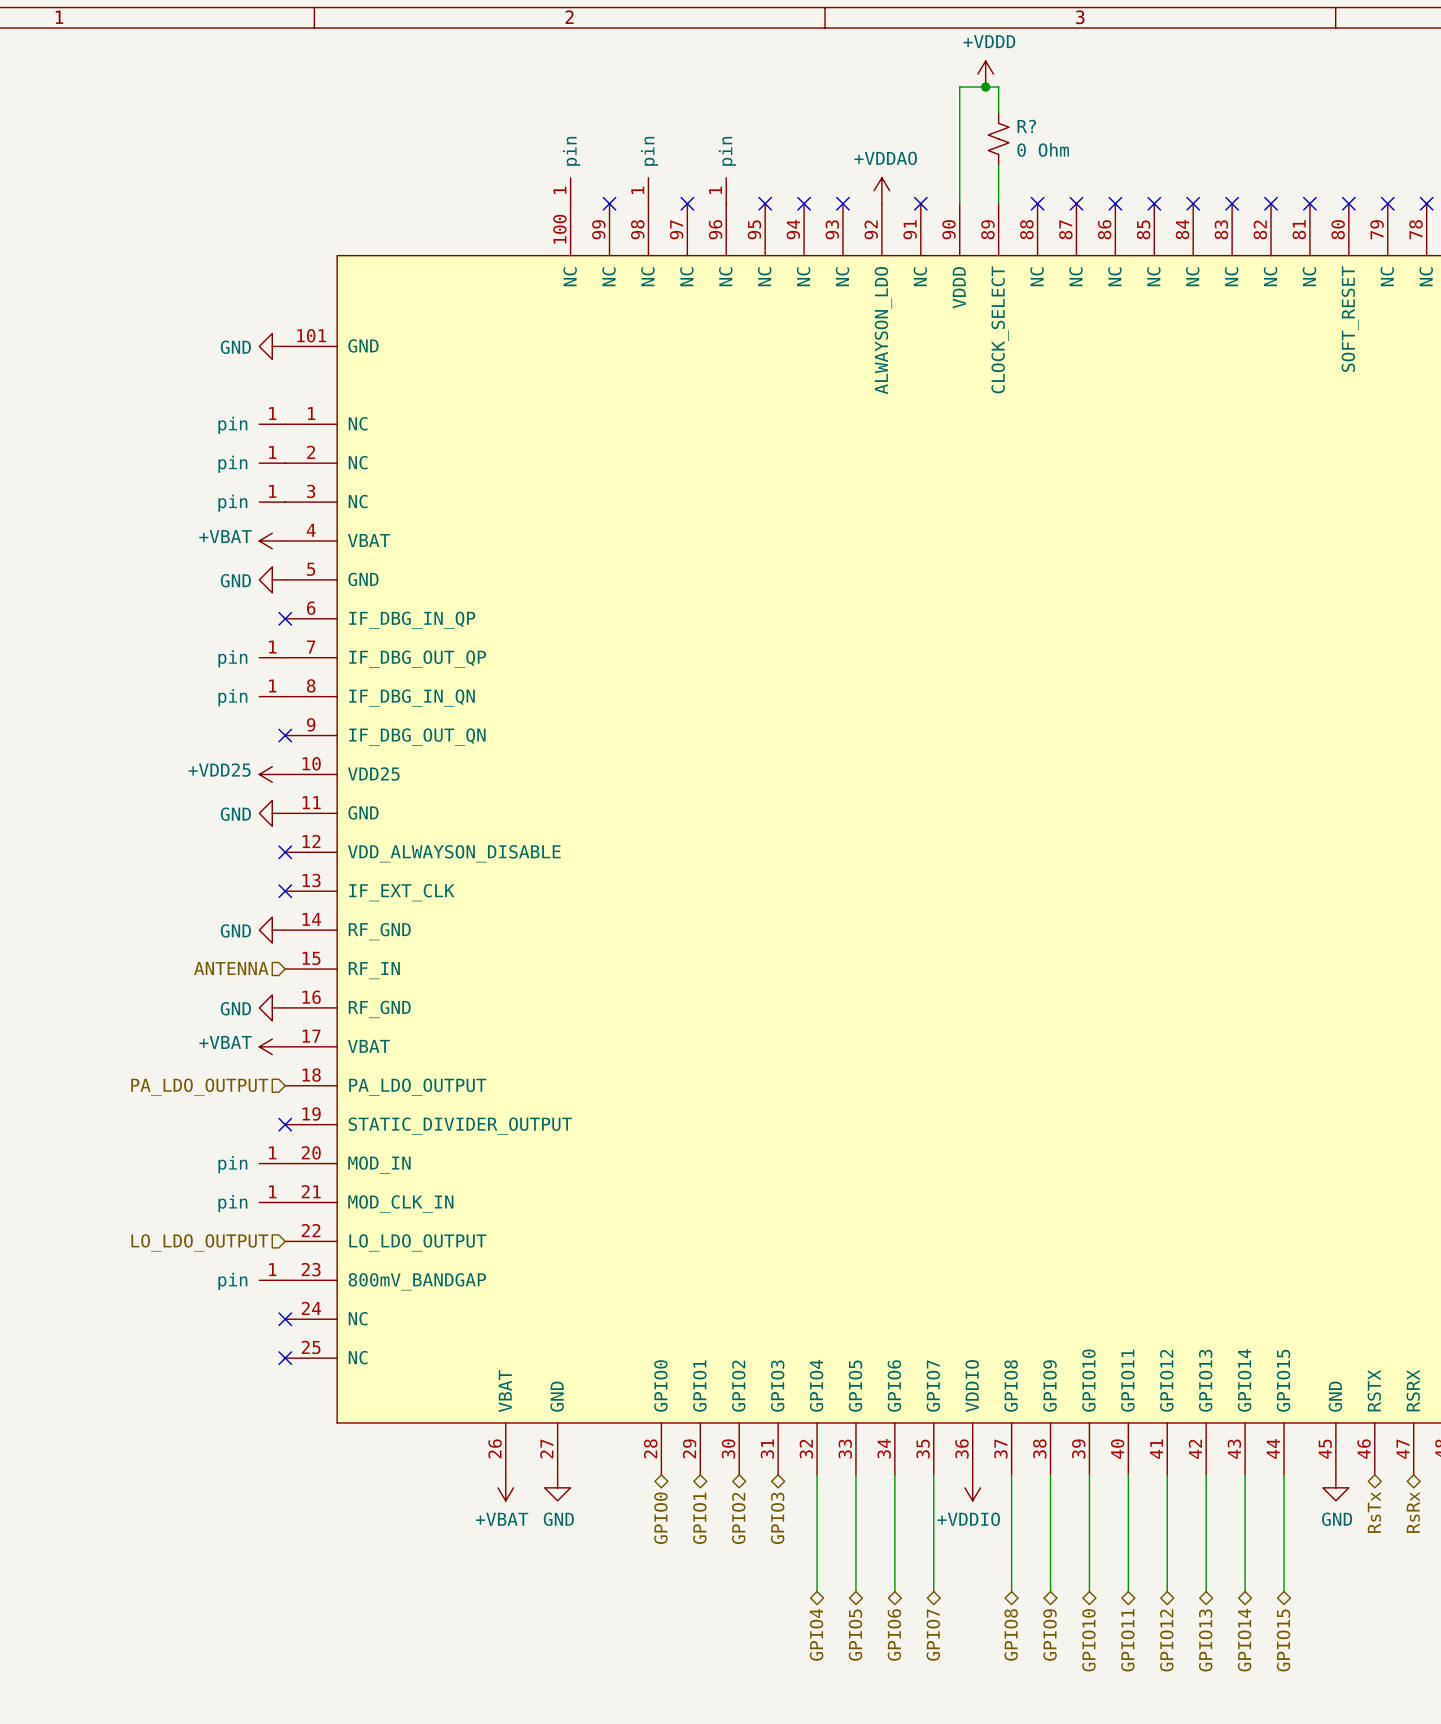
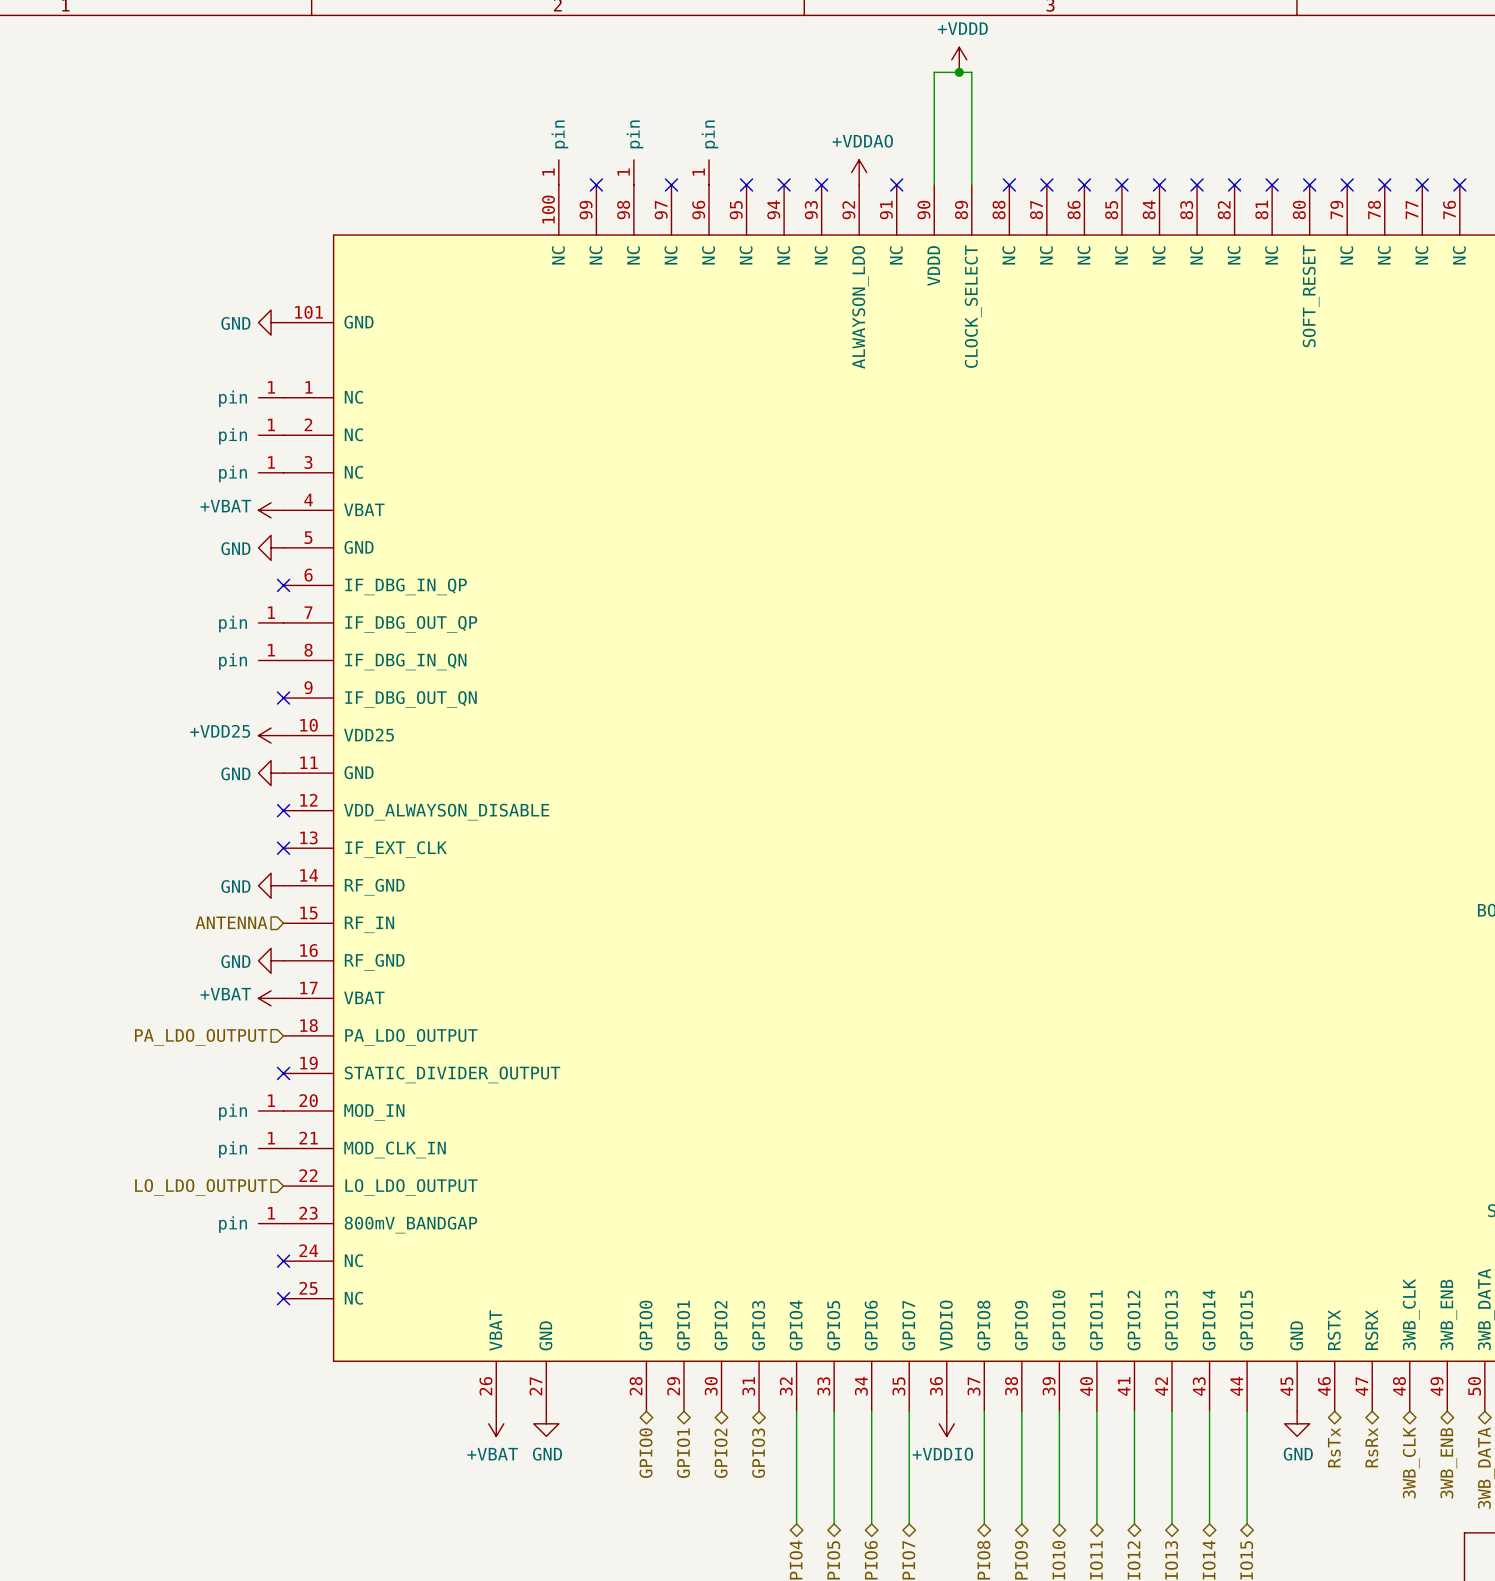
R?: 0 Ohm (998, 138) -> none

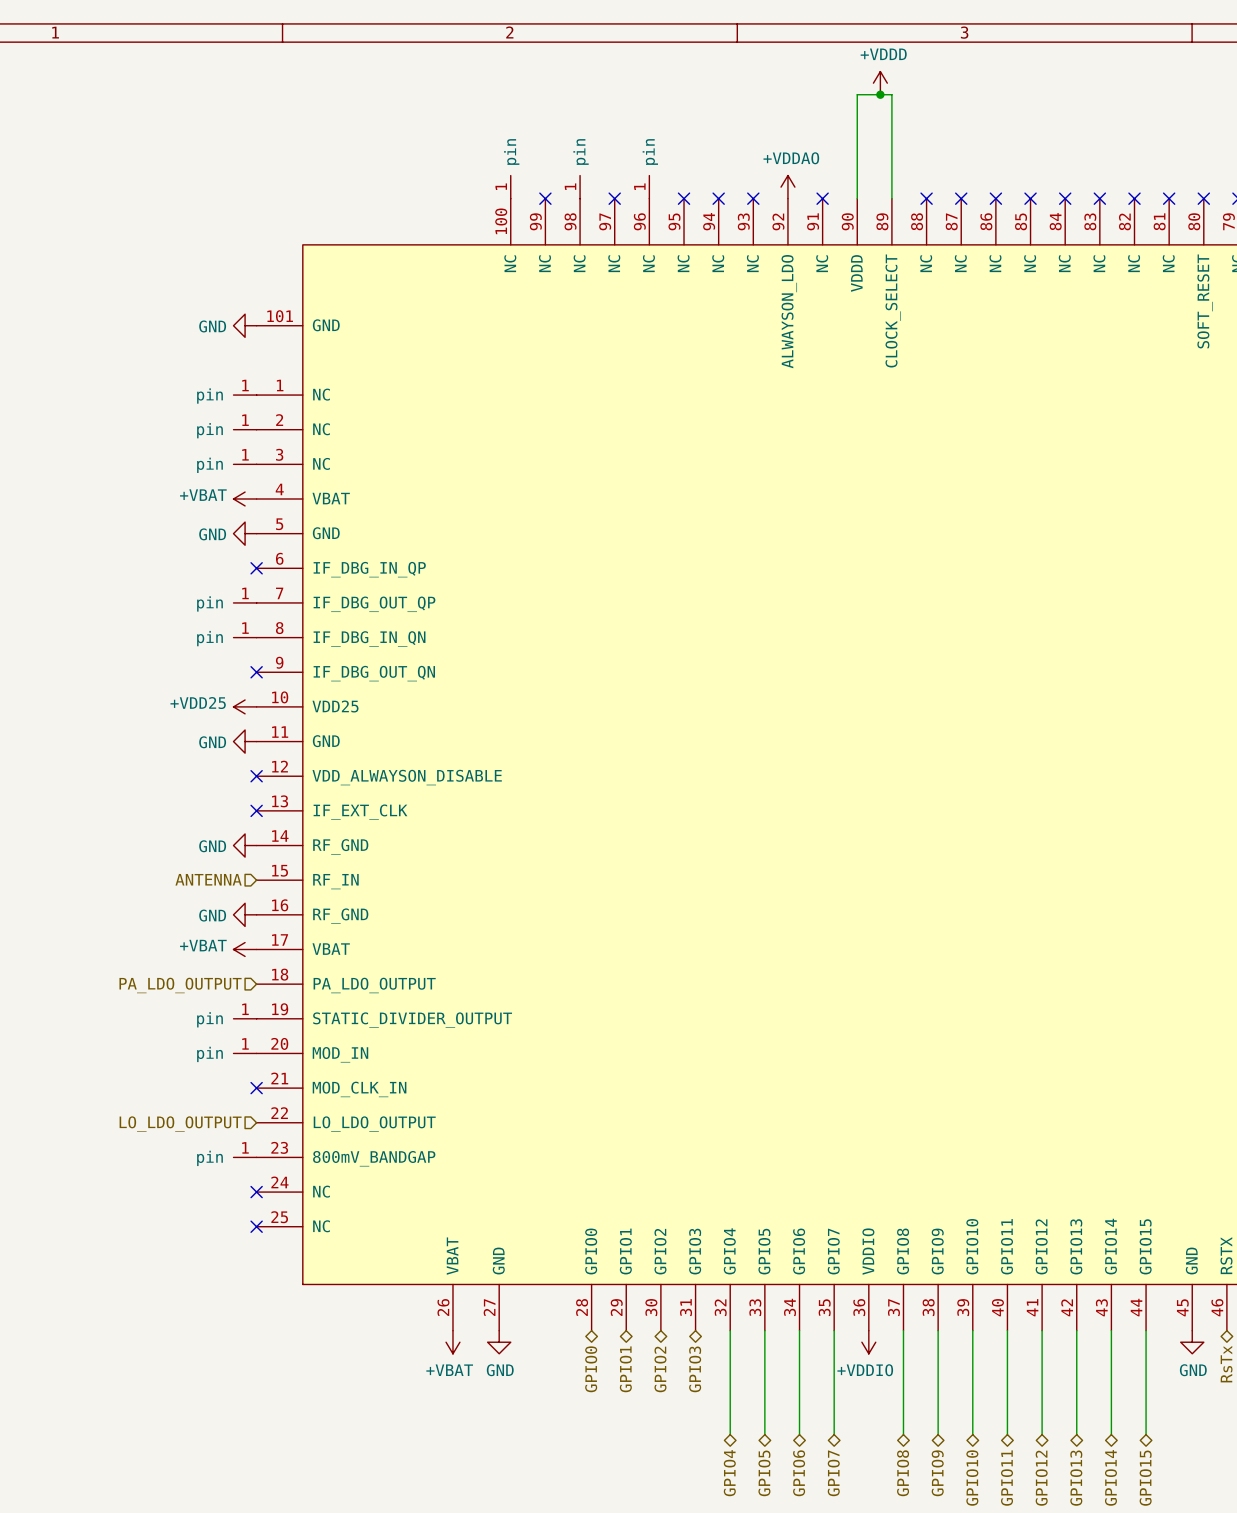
no-connect mark: (283, 1073) -> none
part position: (271, 1148) -> (245, 1018)
no-connect mark: none -> (256, 1088)

